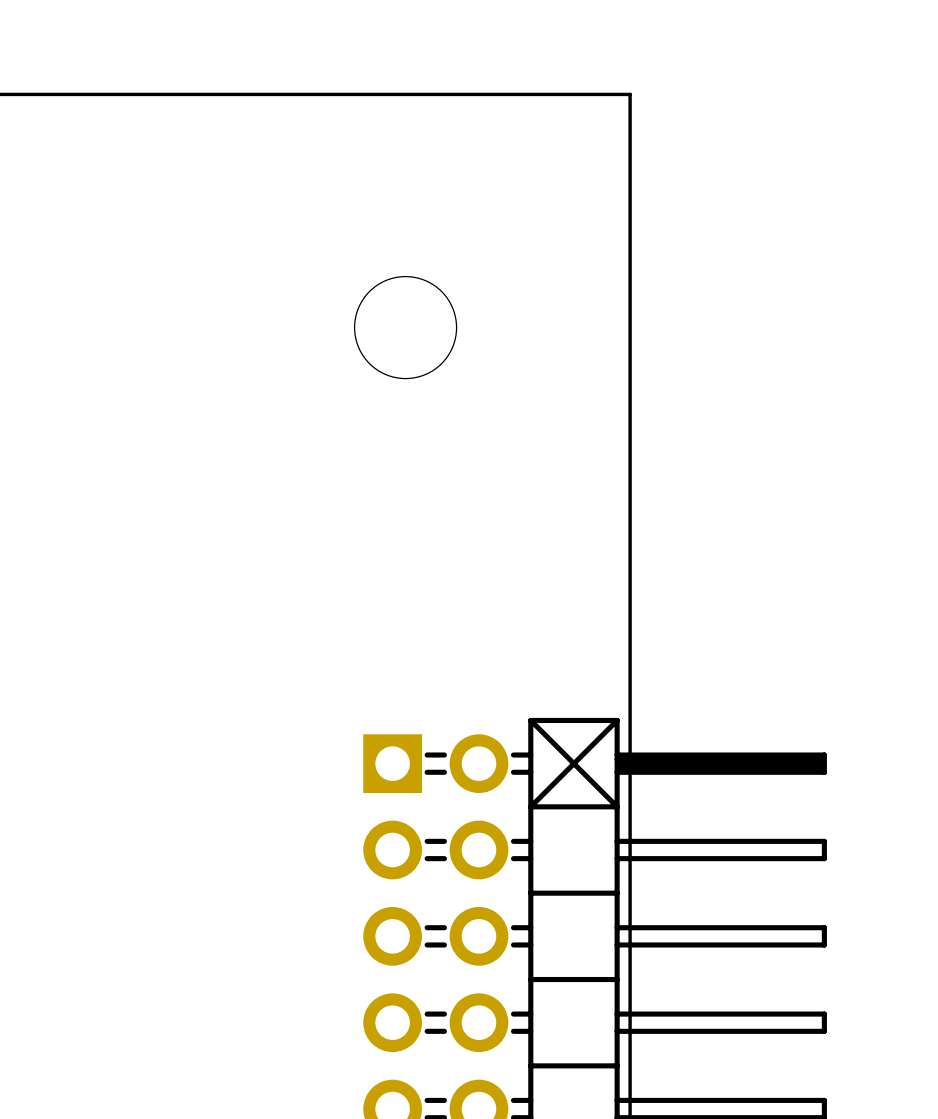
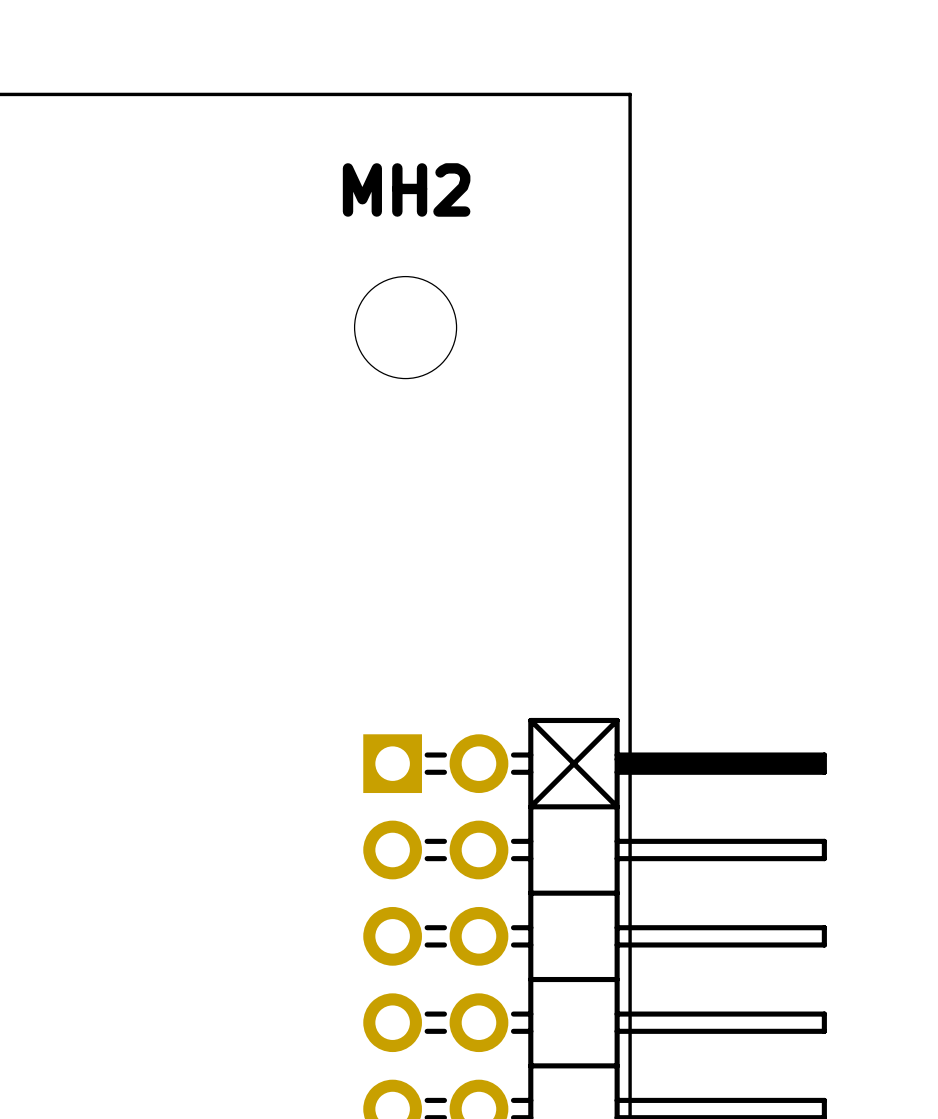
MH2 name: none -> MH2 (406, 189)

